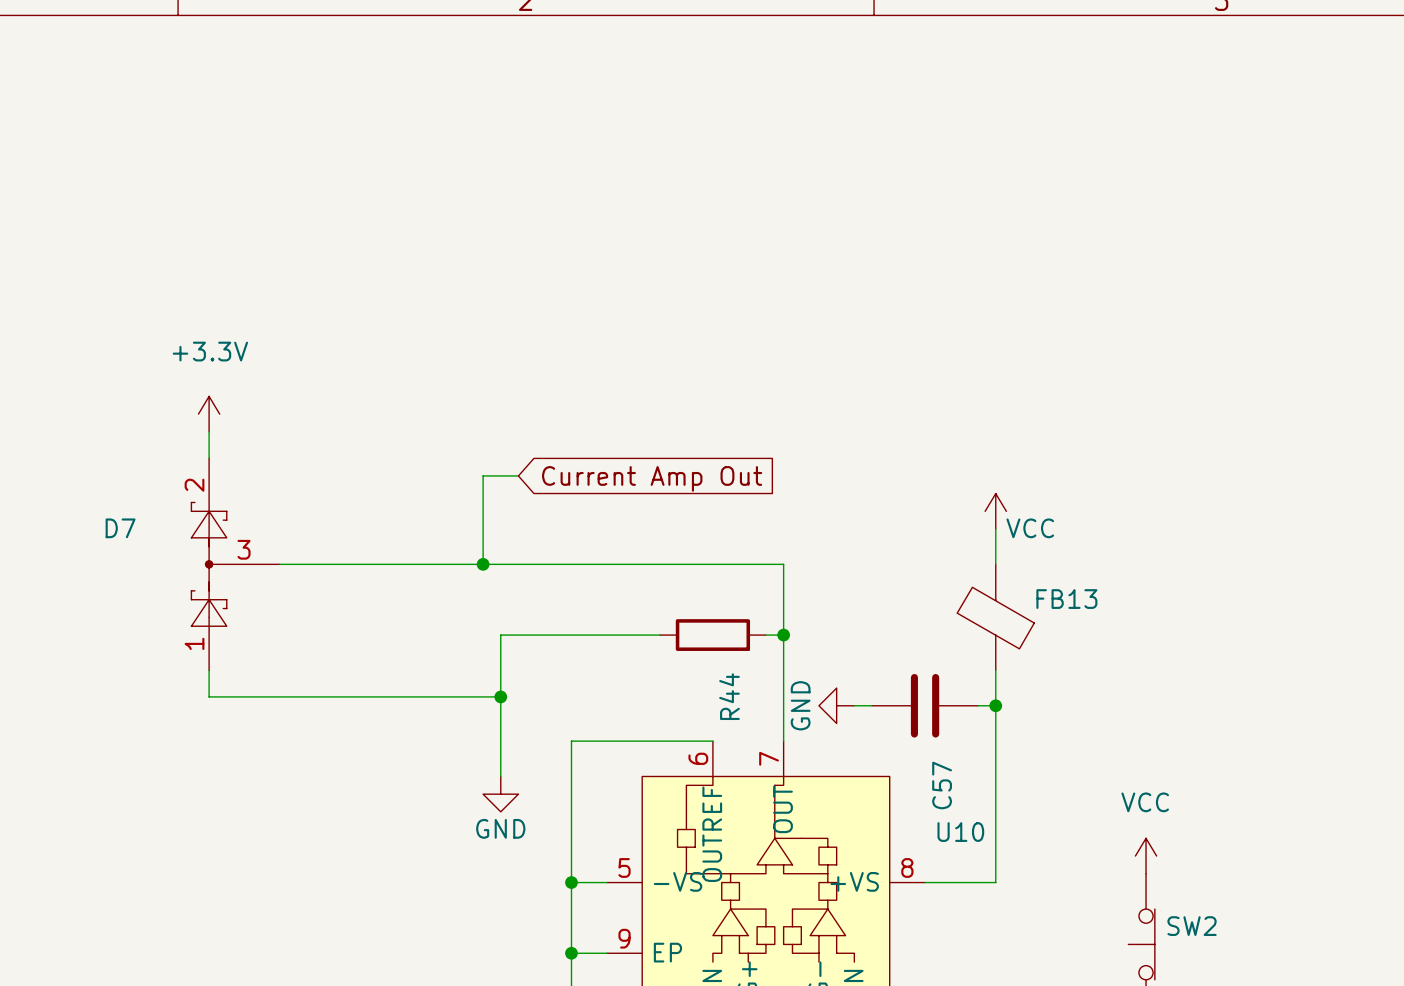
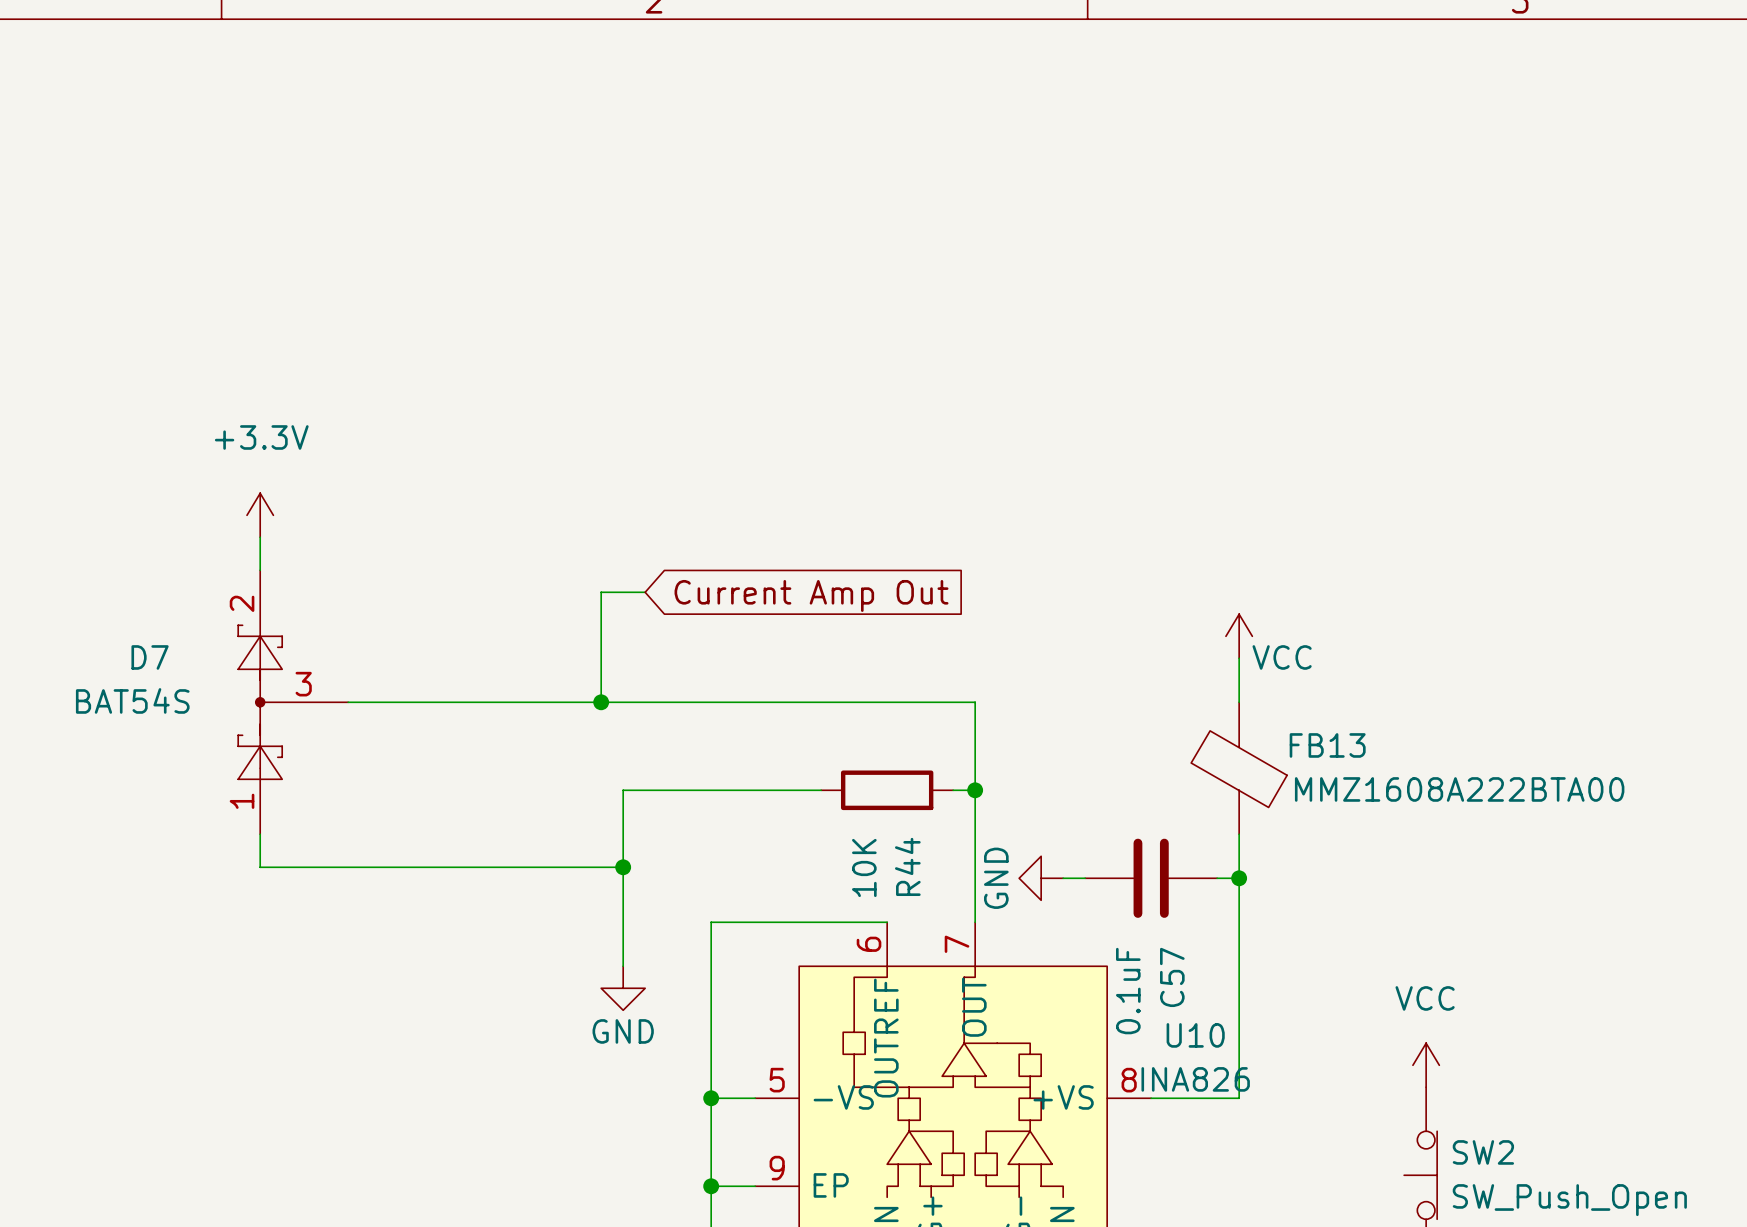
D7 value: none -> BAT54S (132, 700)
FB13 value: none -> MMZ1608A222BTA00 (1459, 789)
R44 value: none -> 10K (864, 867)
C57 value: none -> 0.1uF (1128, 991)
U10 value: none -> INA826 (1195, 1079)
SW2 value: none -> SW_Push_Open (1569, 1200)

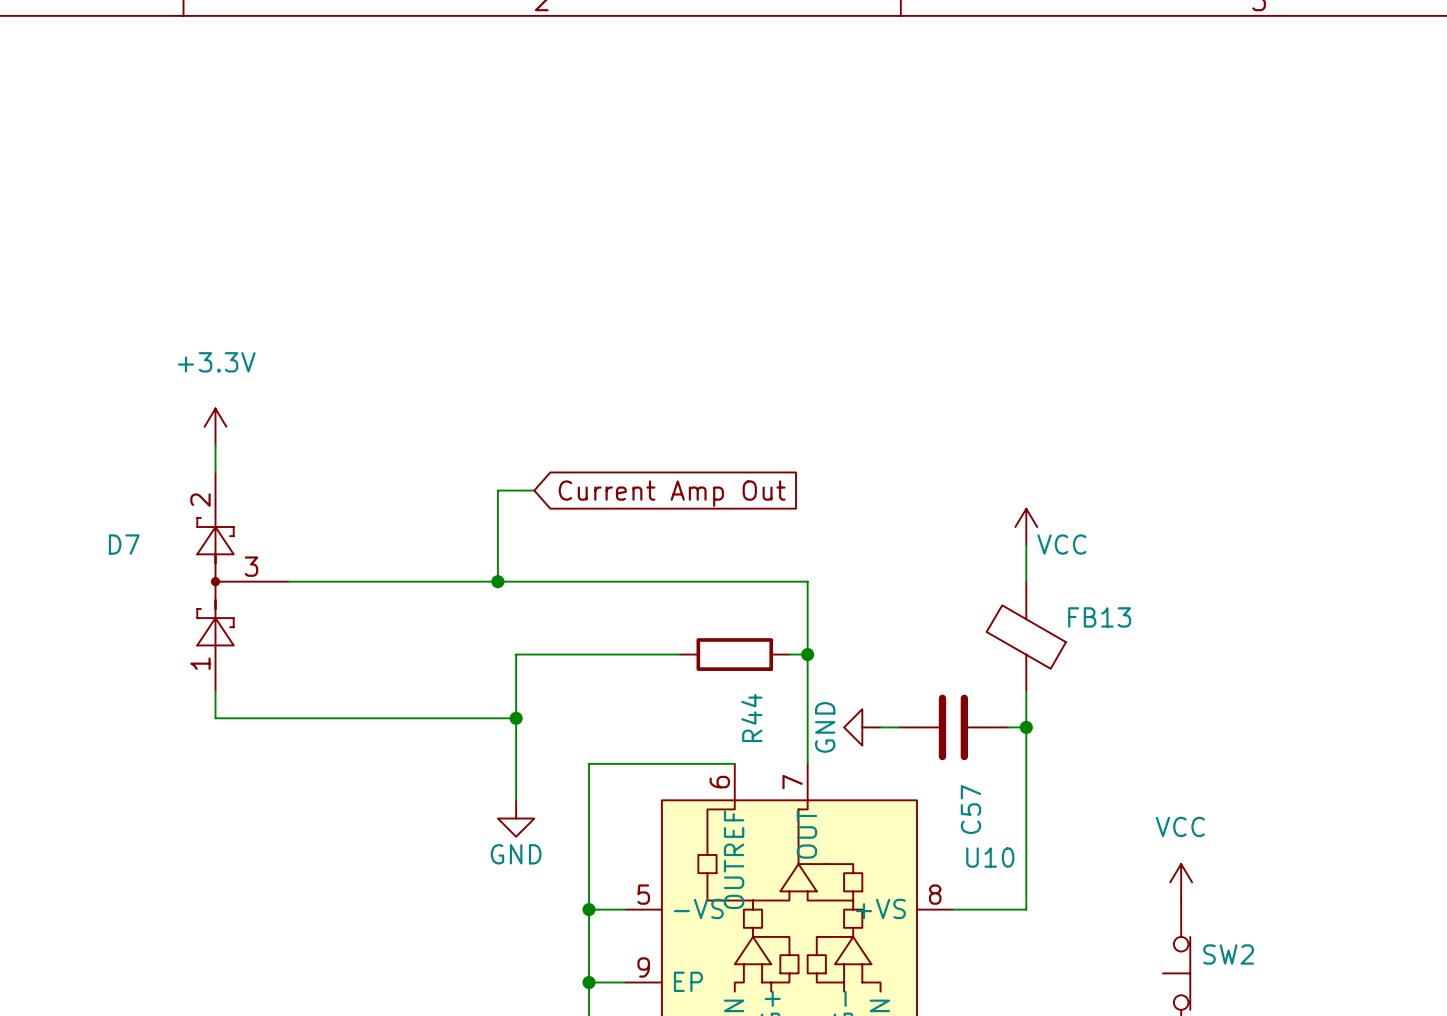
D7 value: BAT54S (132, 700) -> none
FB13 value: MMZ1608A222BTA00 (1459, 789) -> none
R44 value: 10K (864, 867) -> none
C57 value: 0.1uF (1128, 991) -> none
U10 value: INA826 (1195, 1079) -> none
SW2 value: SW_Push_Open (1569, 1200) -> none

